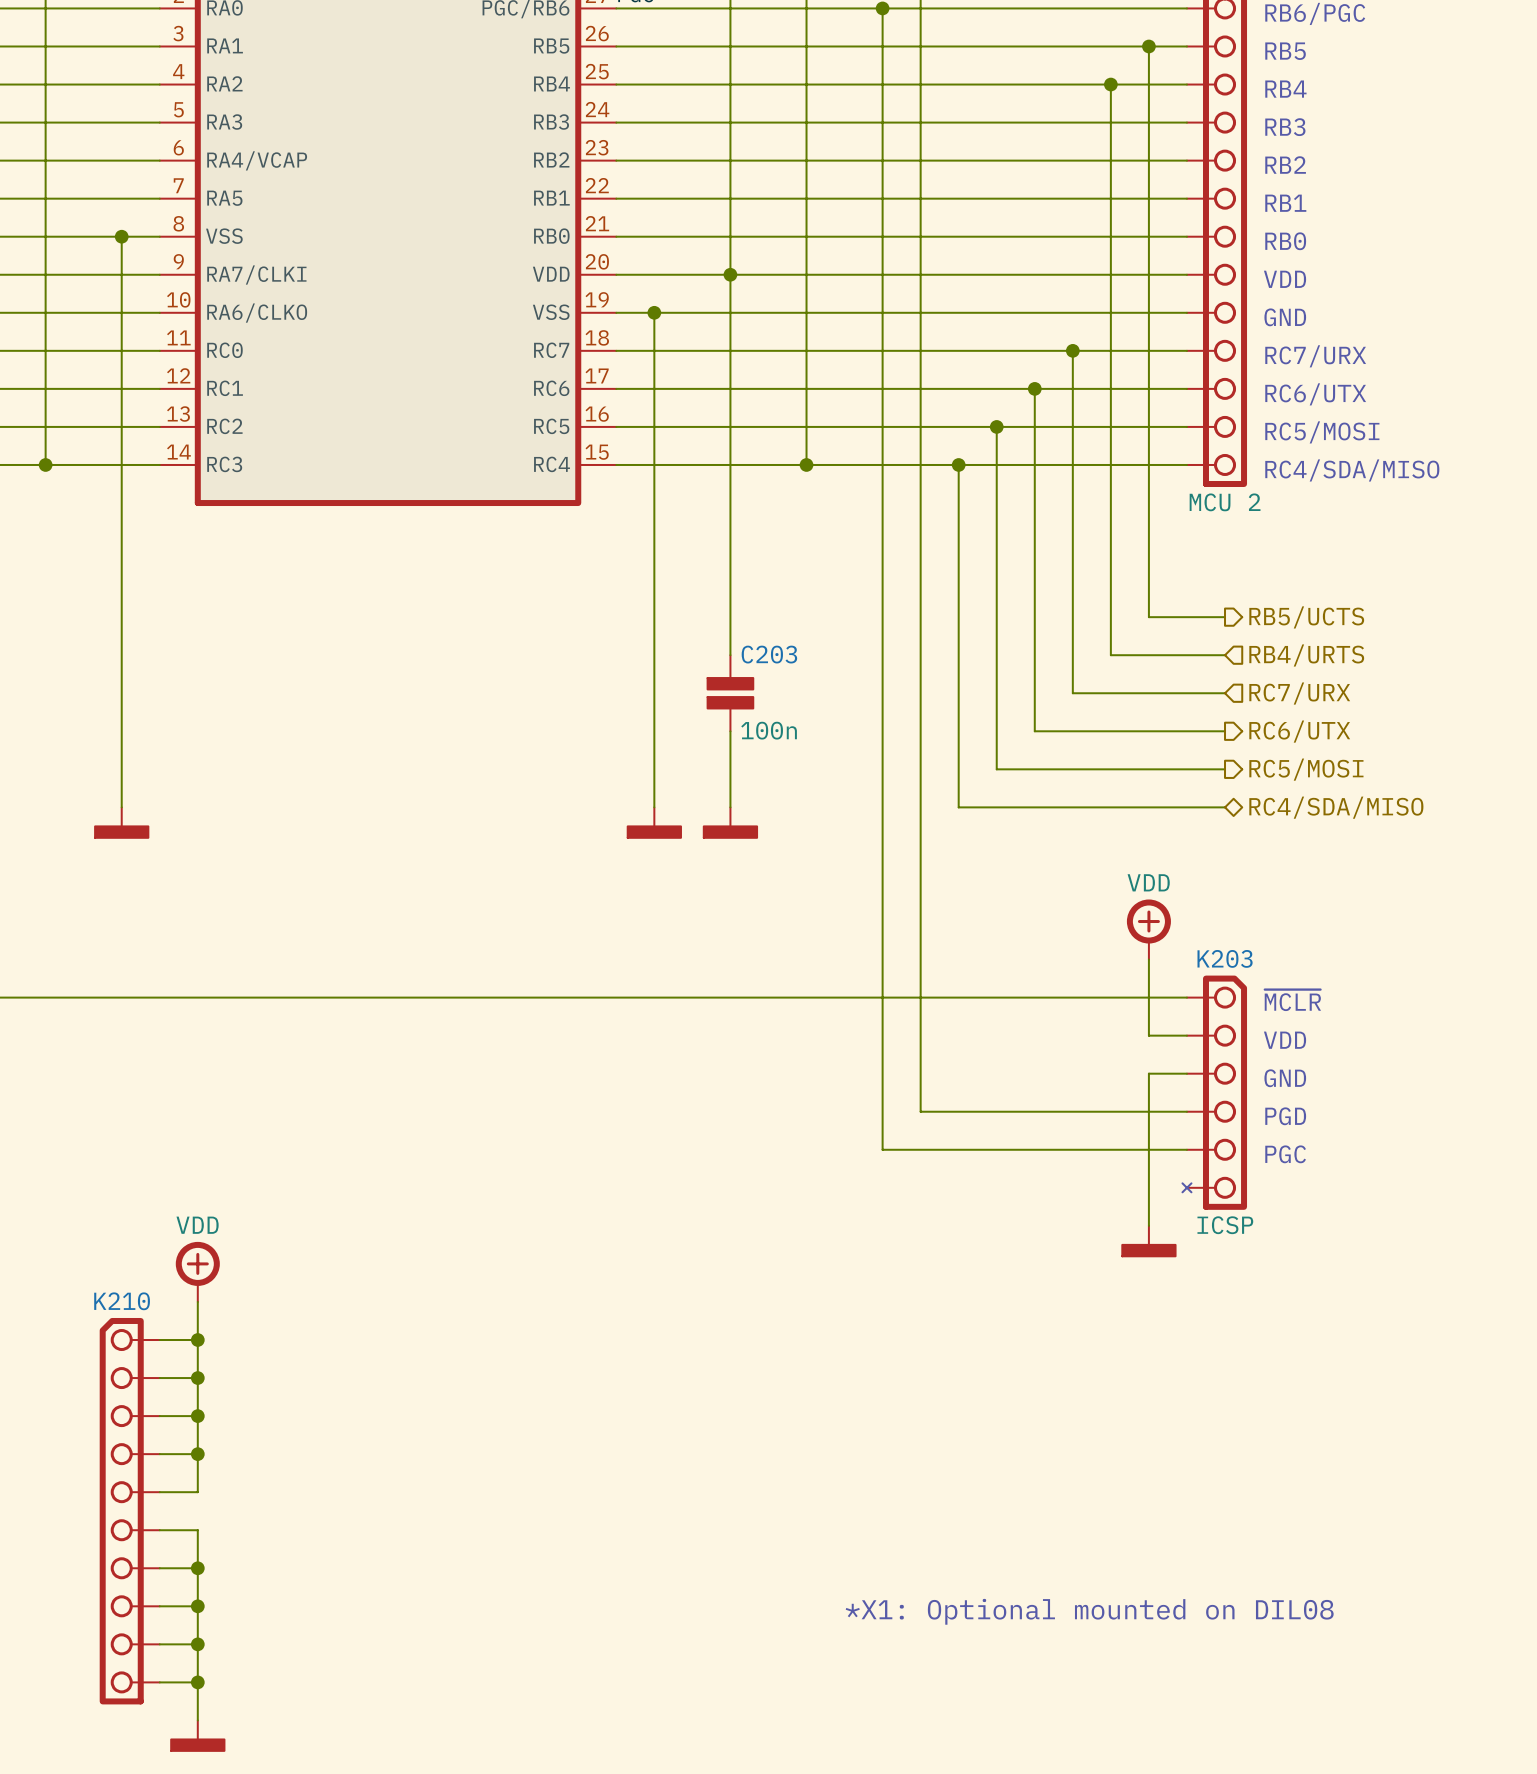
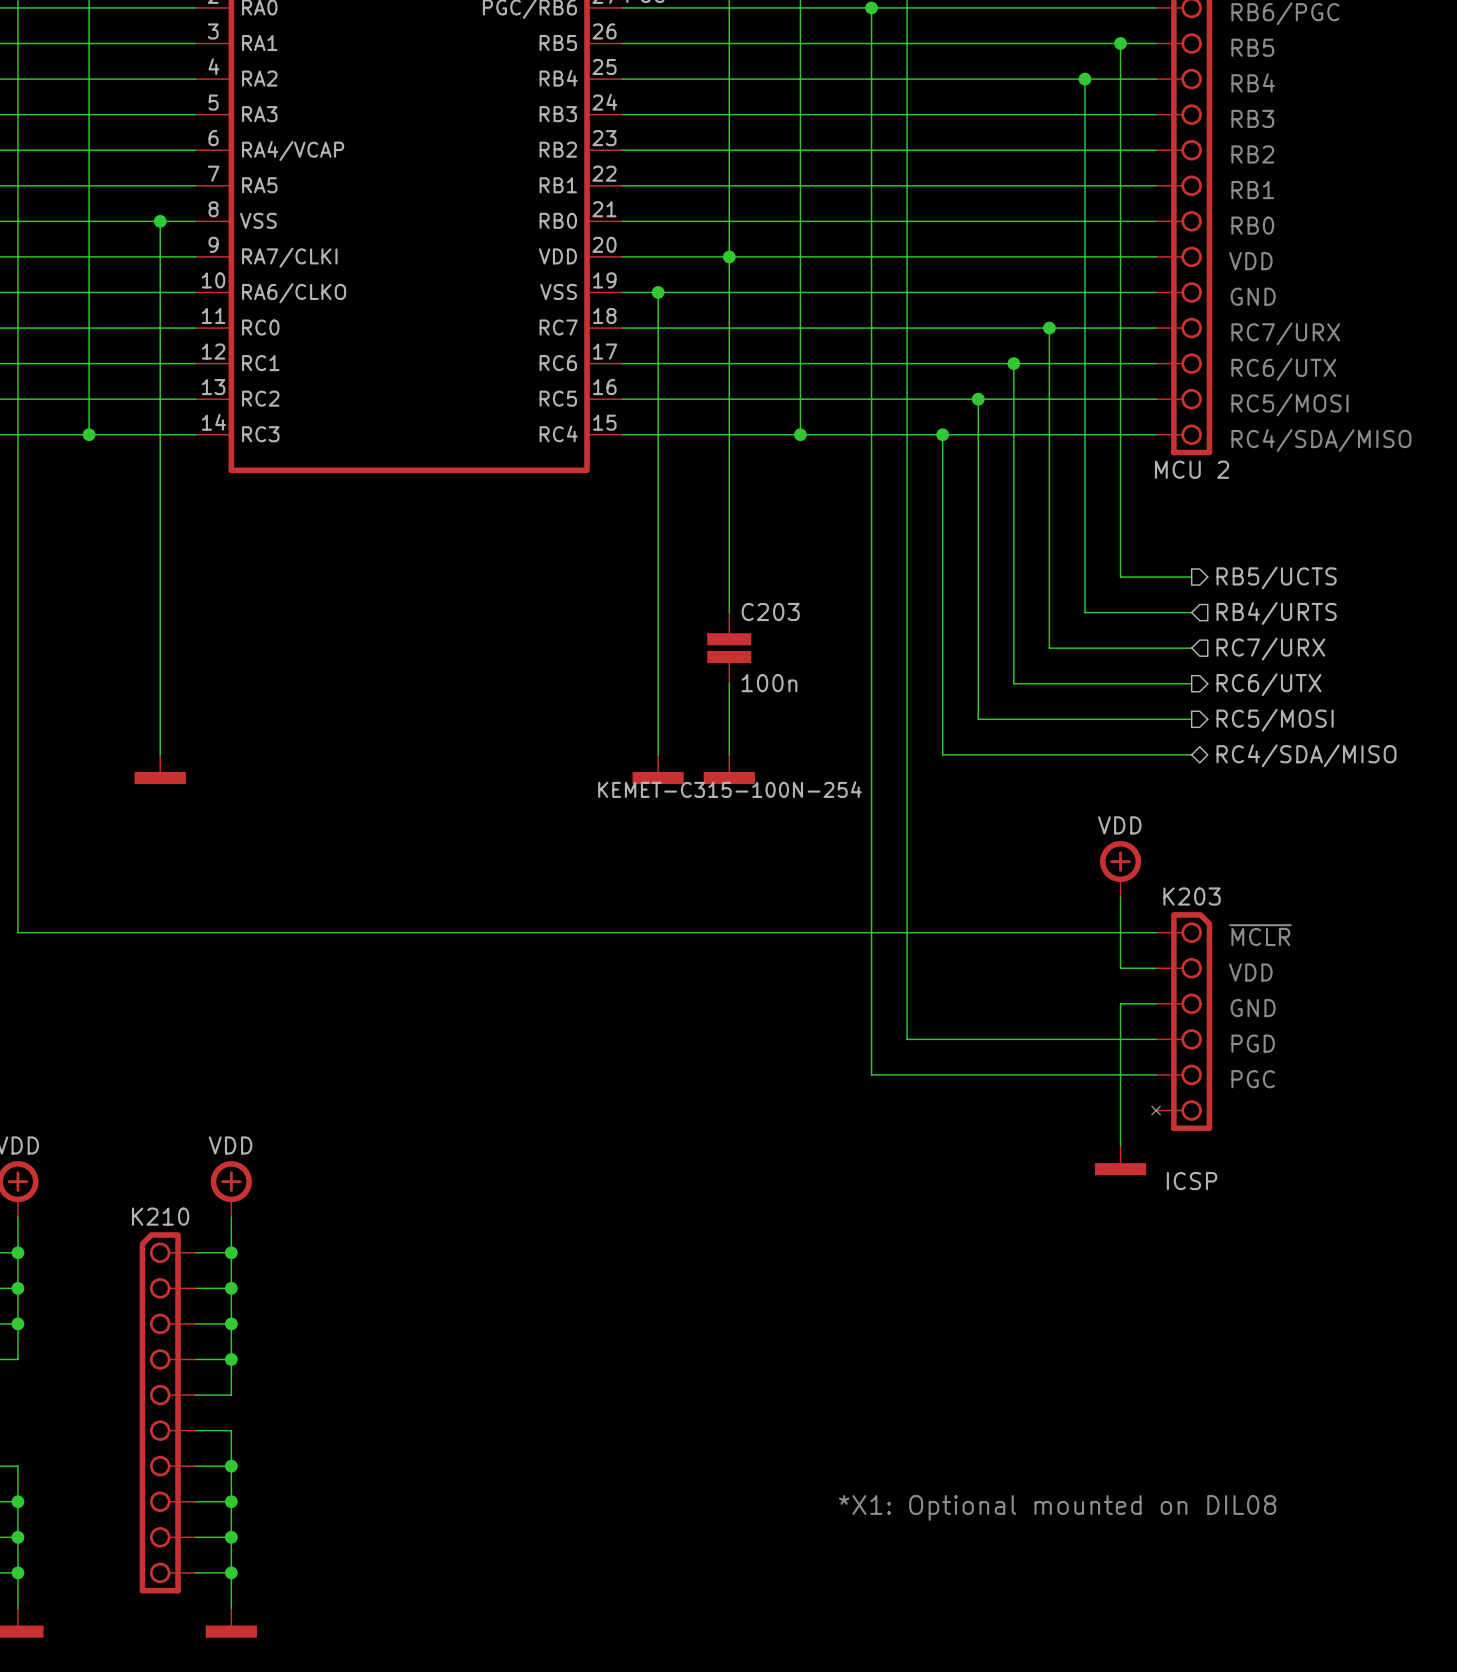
C203 text: none -> KEMET-C315-100N-254 (729, 789)
K203 text: ICSP (1225, 1225) -> none
K203 value: none -> ICSP (1192, 1181)

